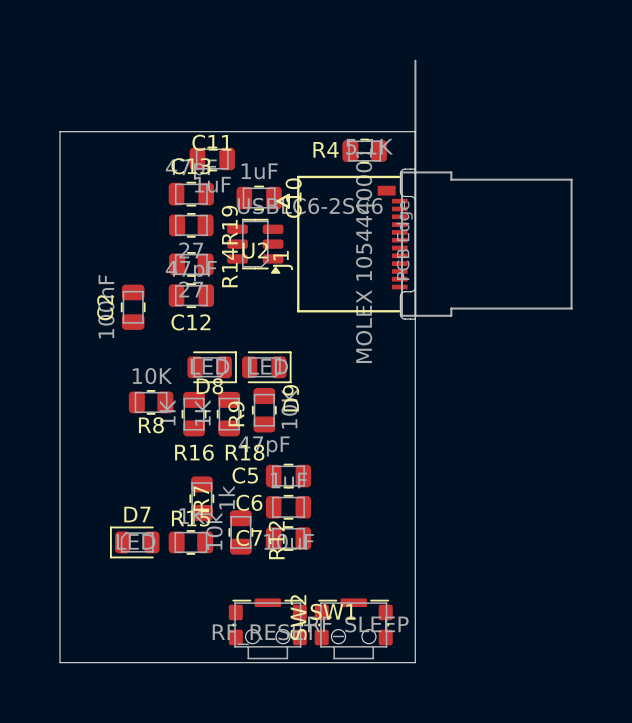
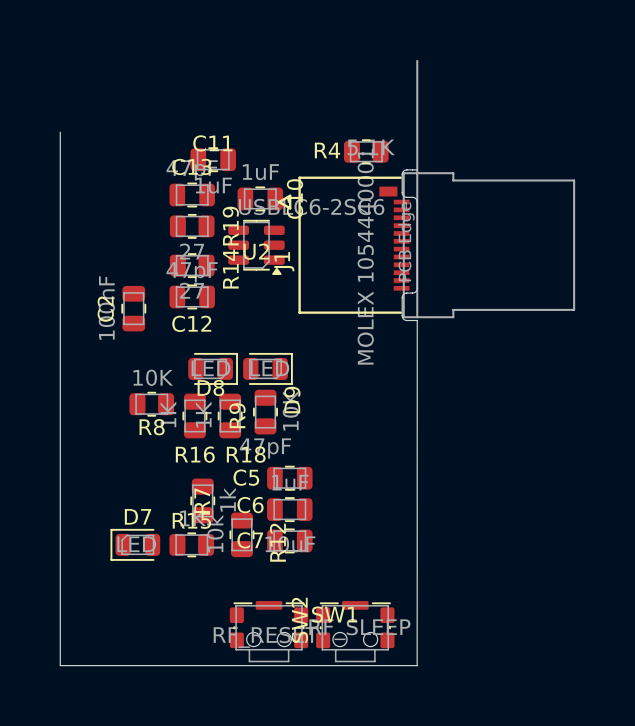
board edge: (60, 131) (415, 131) (415, 662) -> (417, 320) (417, 665)

